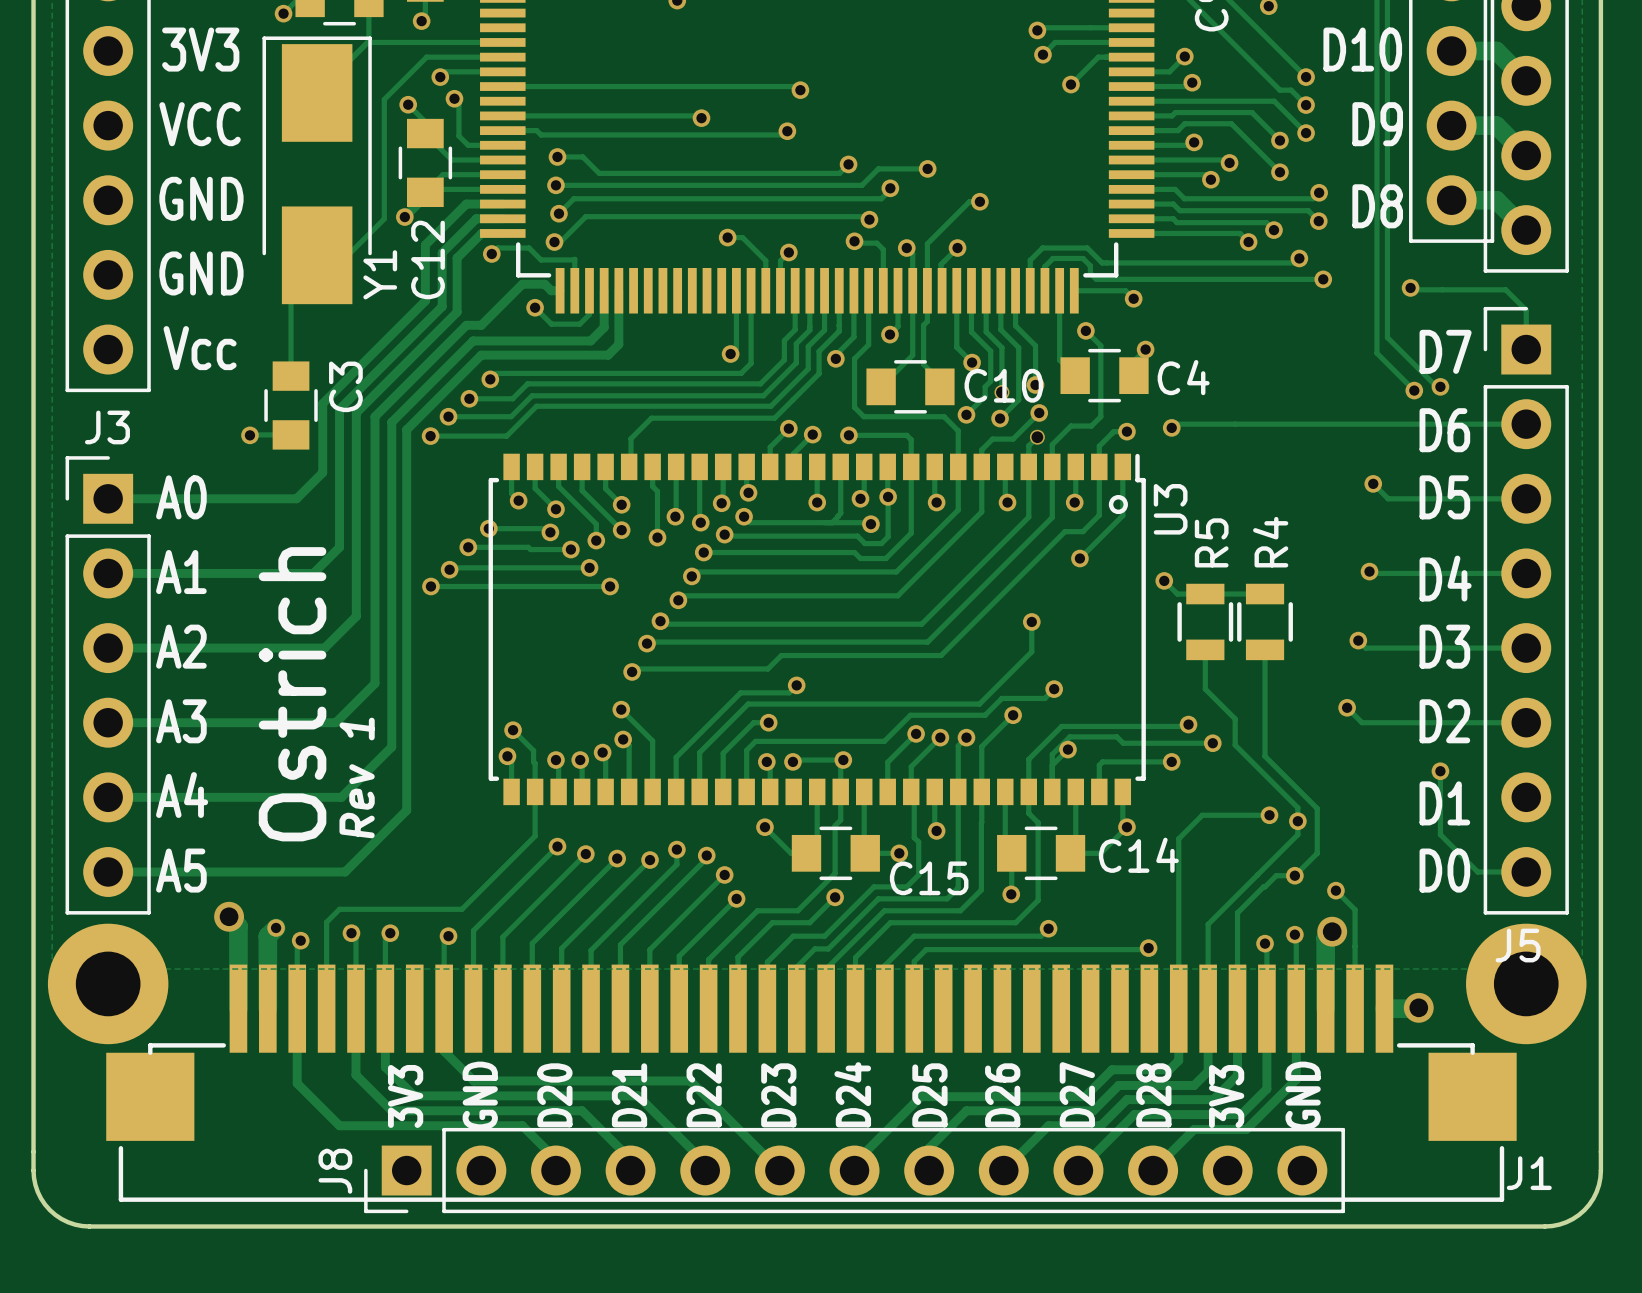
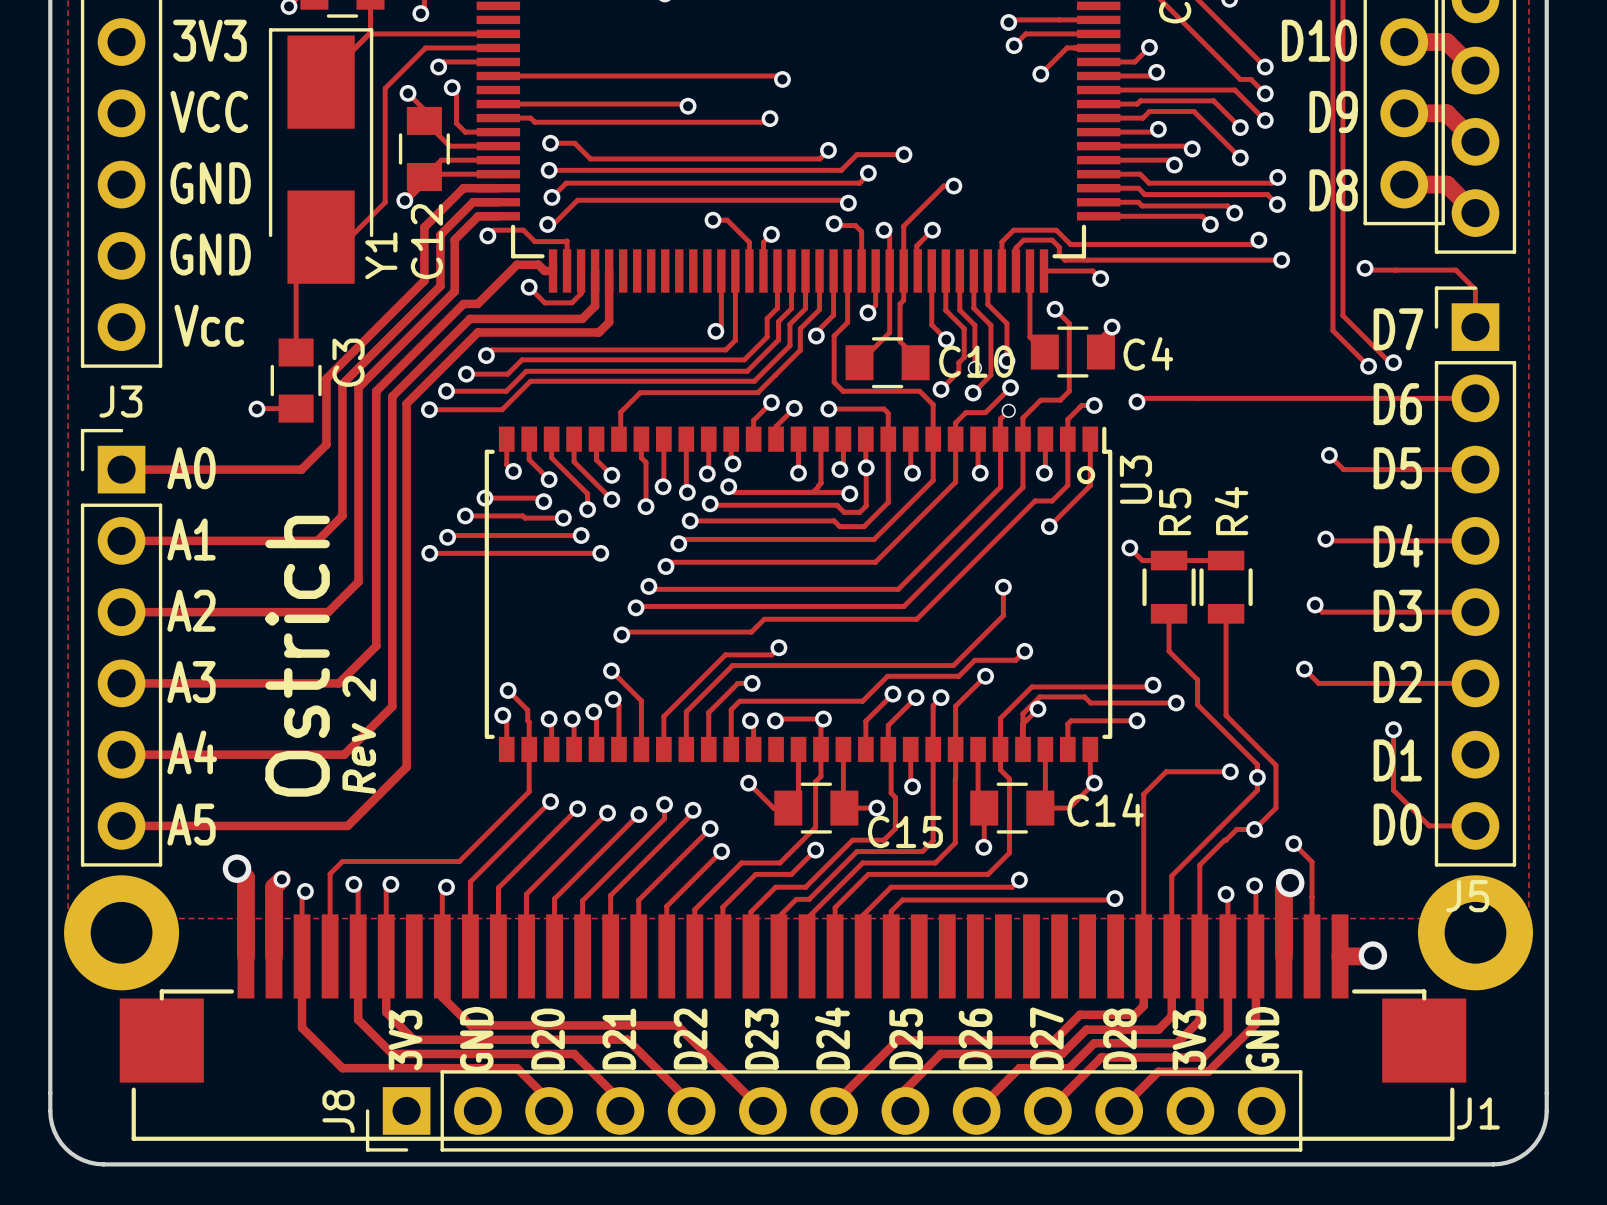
text: Rev 1 (357, 777) -> Rev 2 (359, 734)

